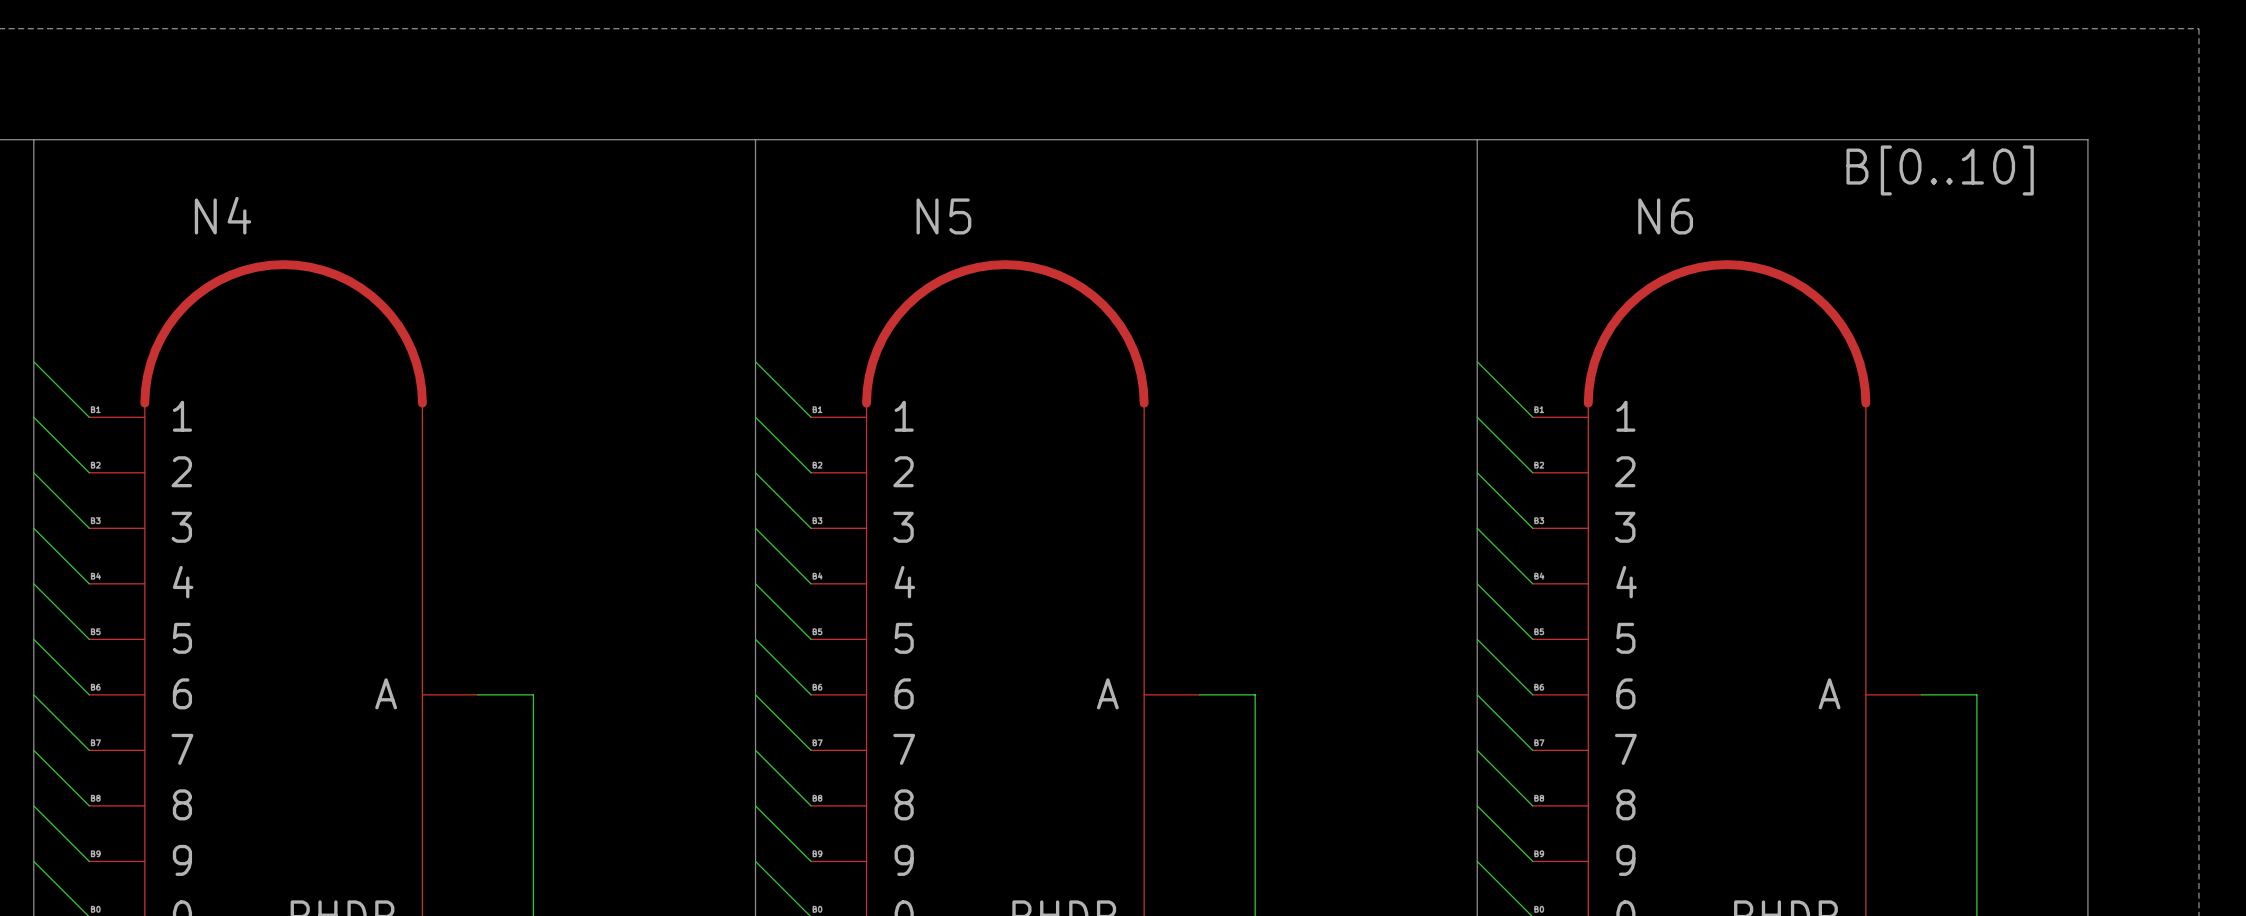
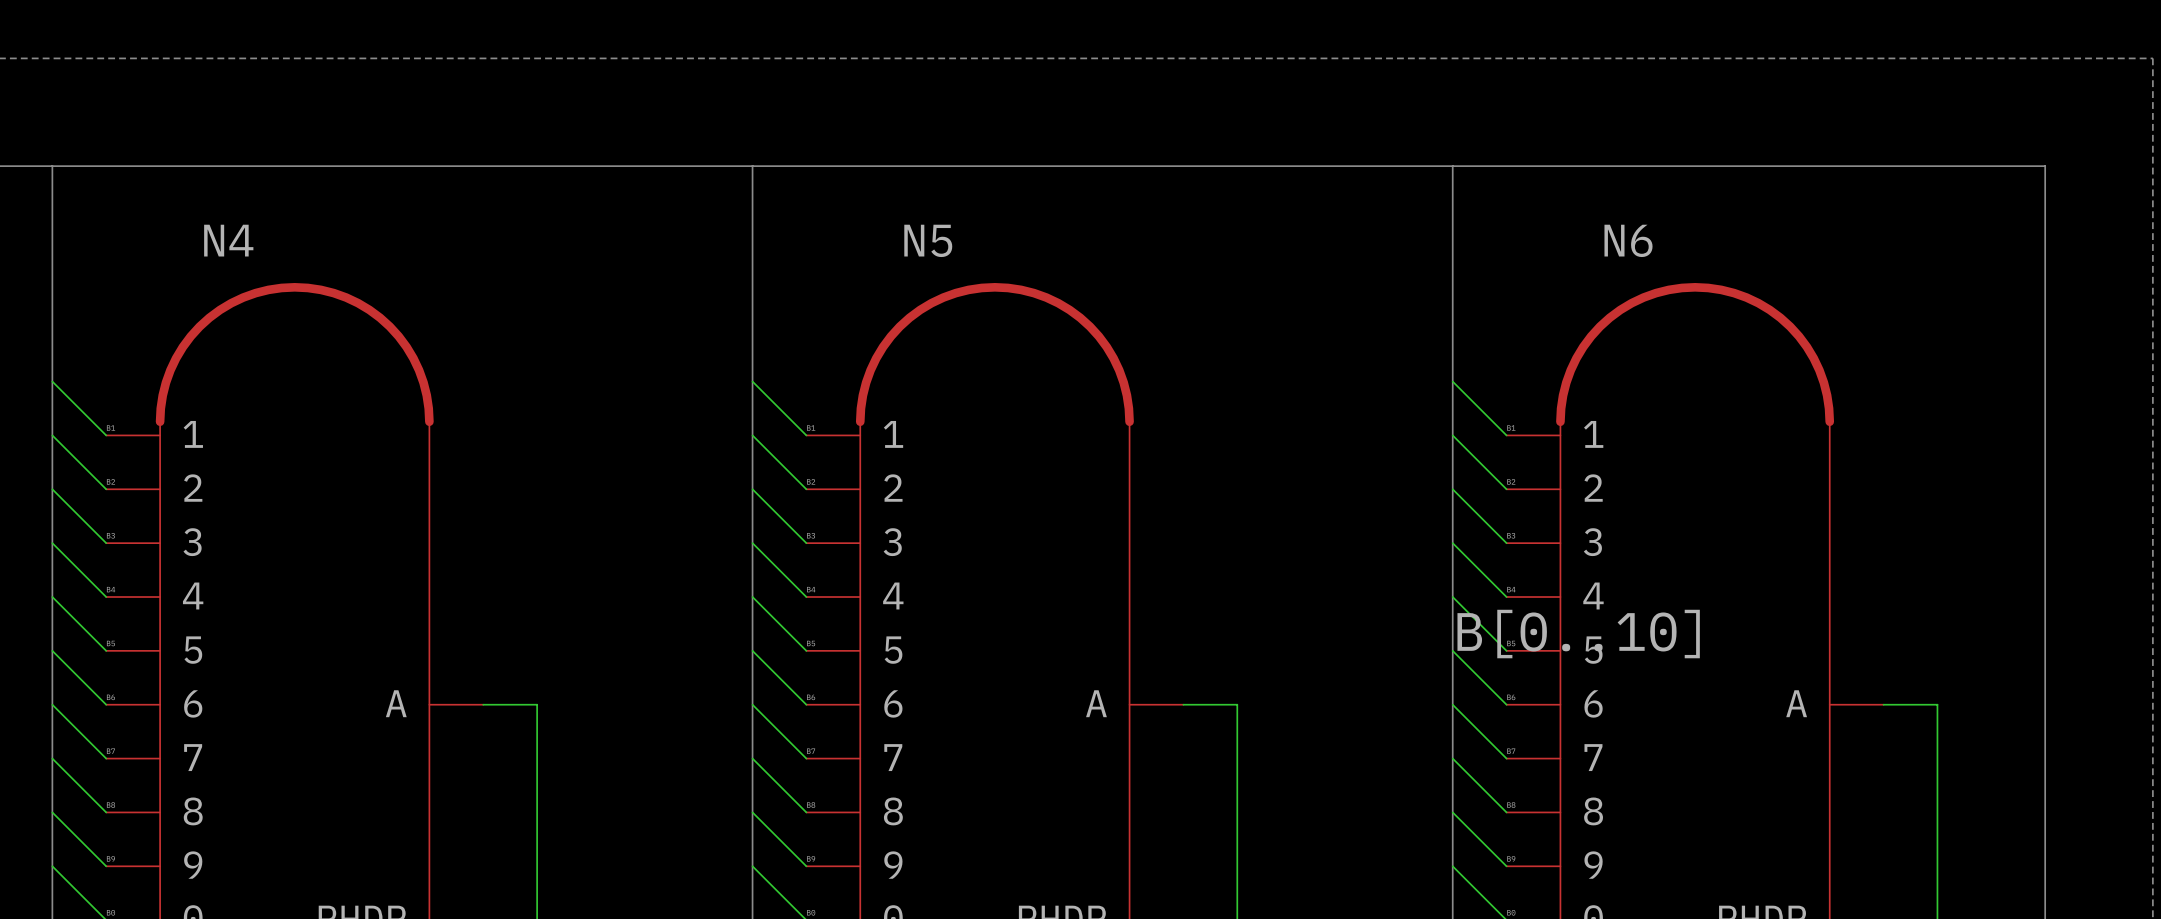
label: B[0..10] (1940, 170) -> none
label: none -> B[0..10] (1578, 634)

